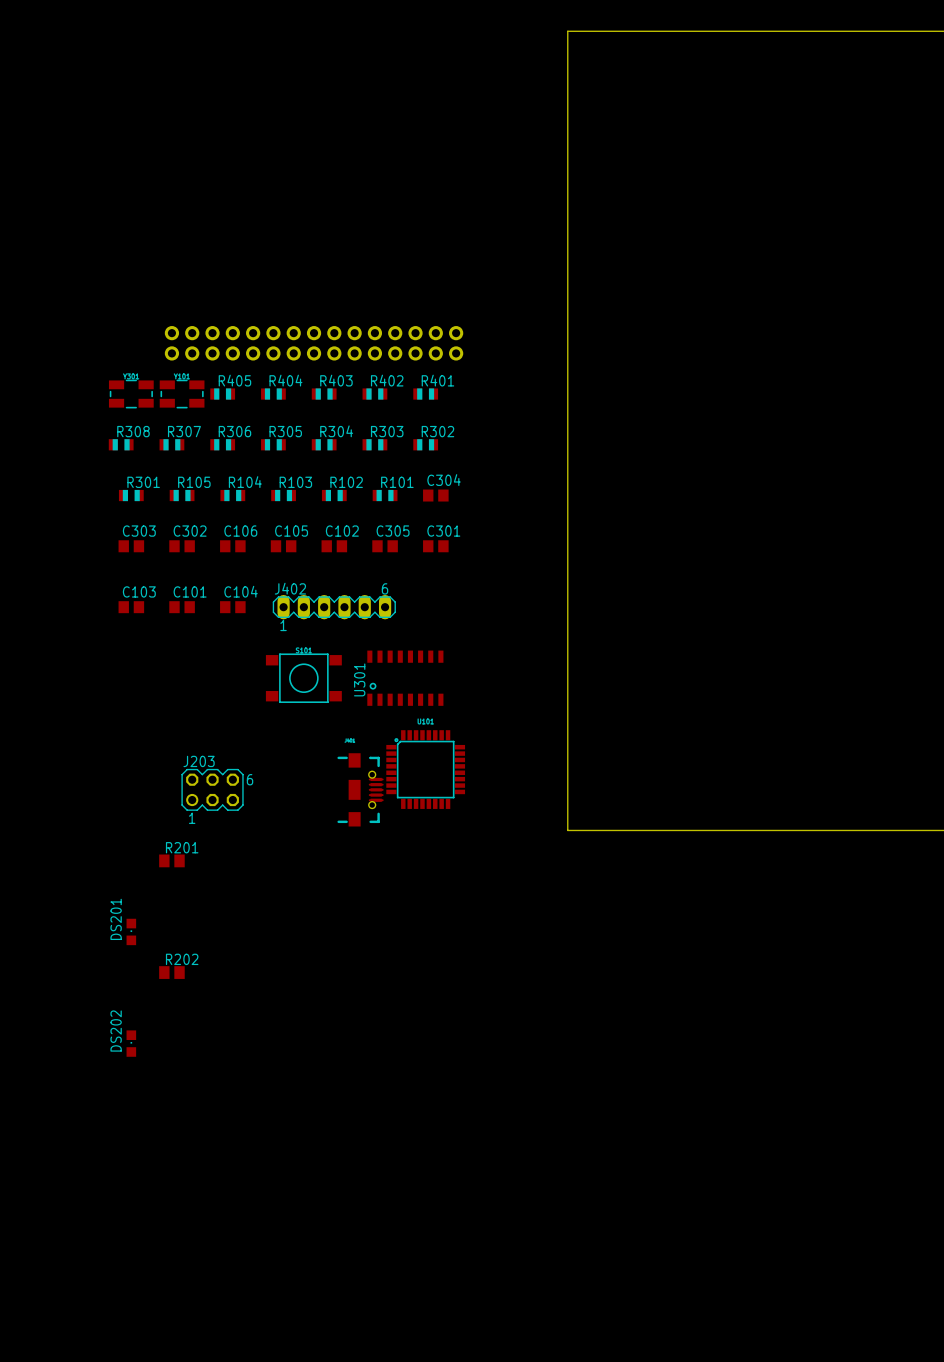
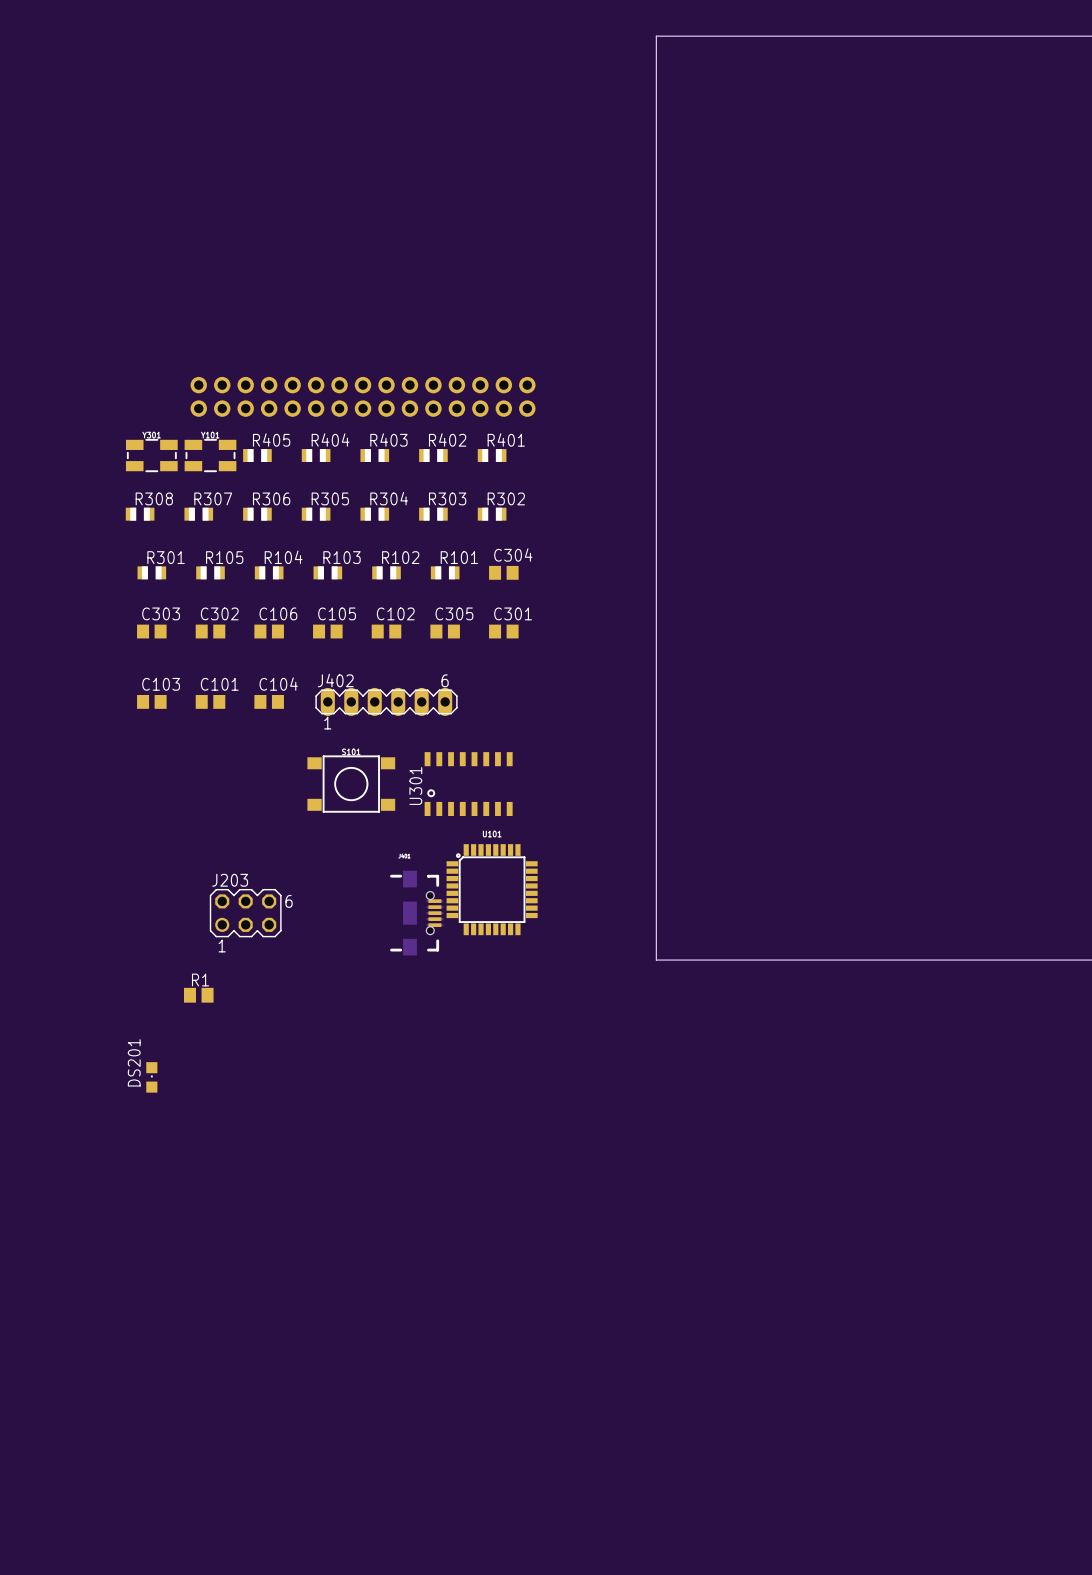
R201 name: R201 (182, 847) -> R1 (200, 980)
R202: (171, 972) -> none
DS202: (131, 1043) -> none

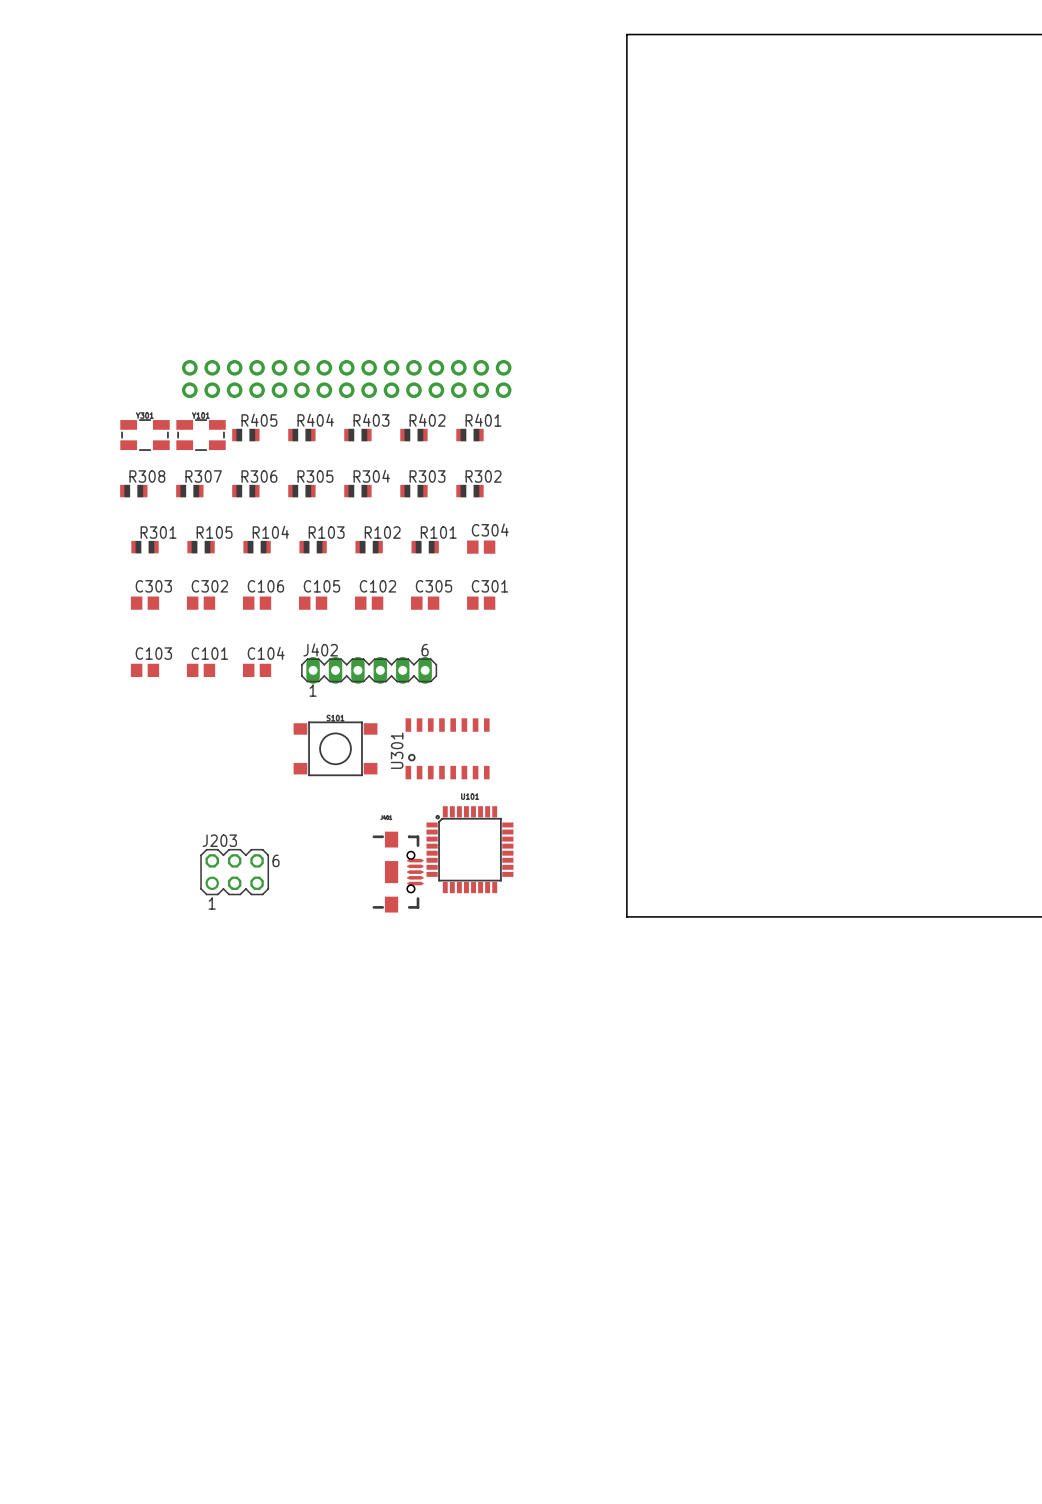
R1: (198, 995) -> none
DS201: (151, 1077) -> none

